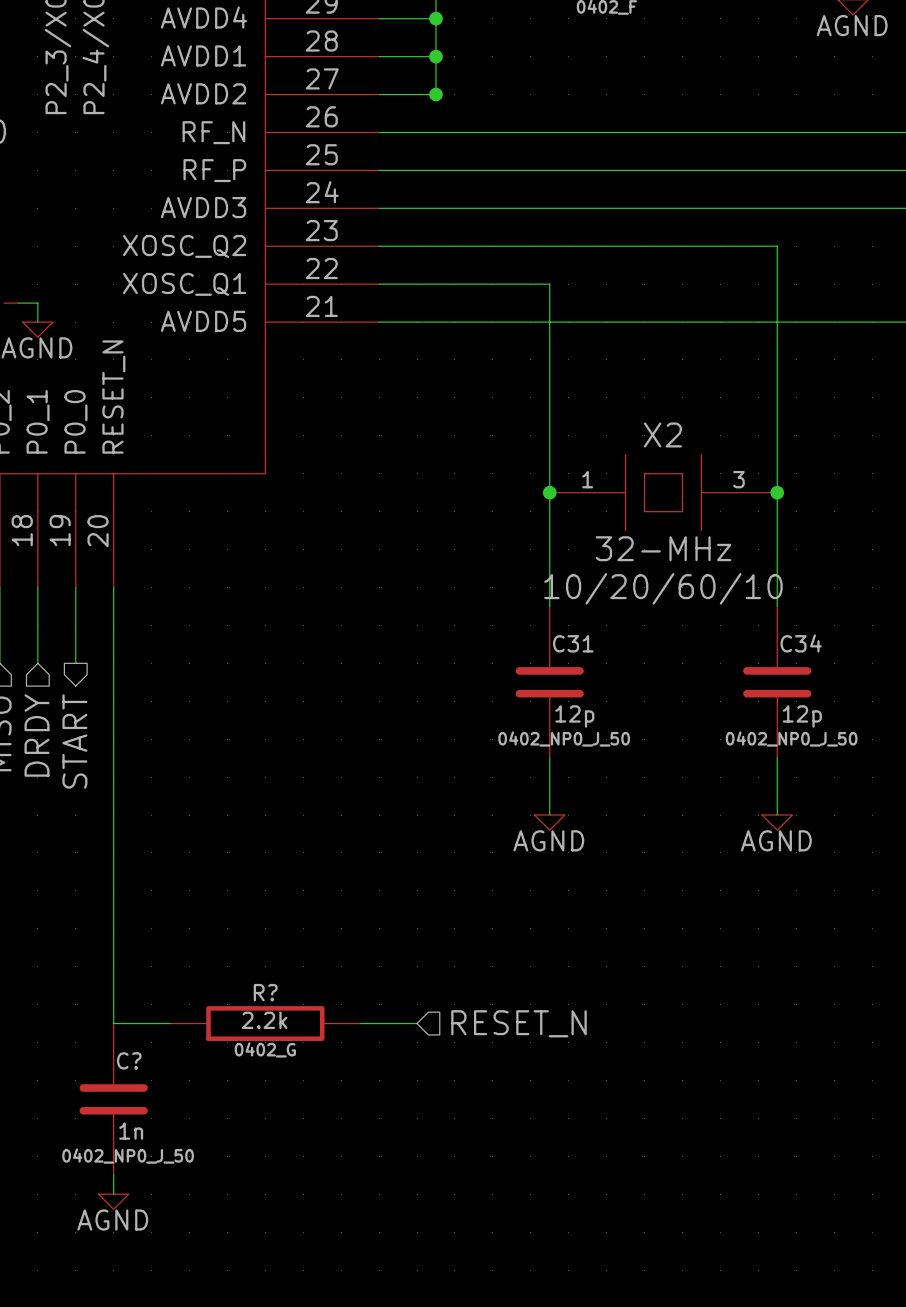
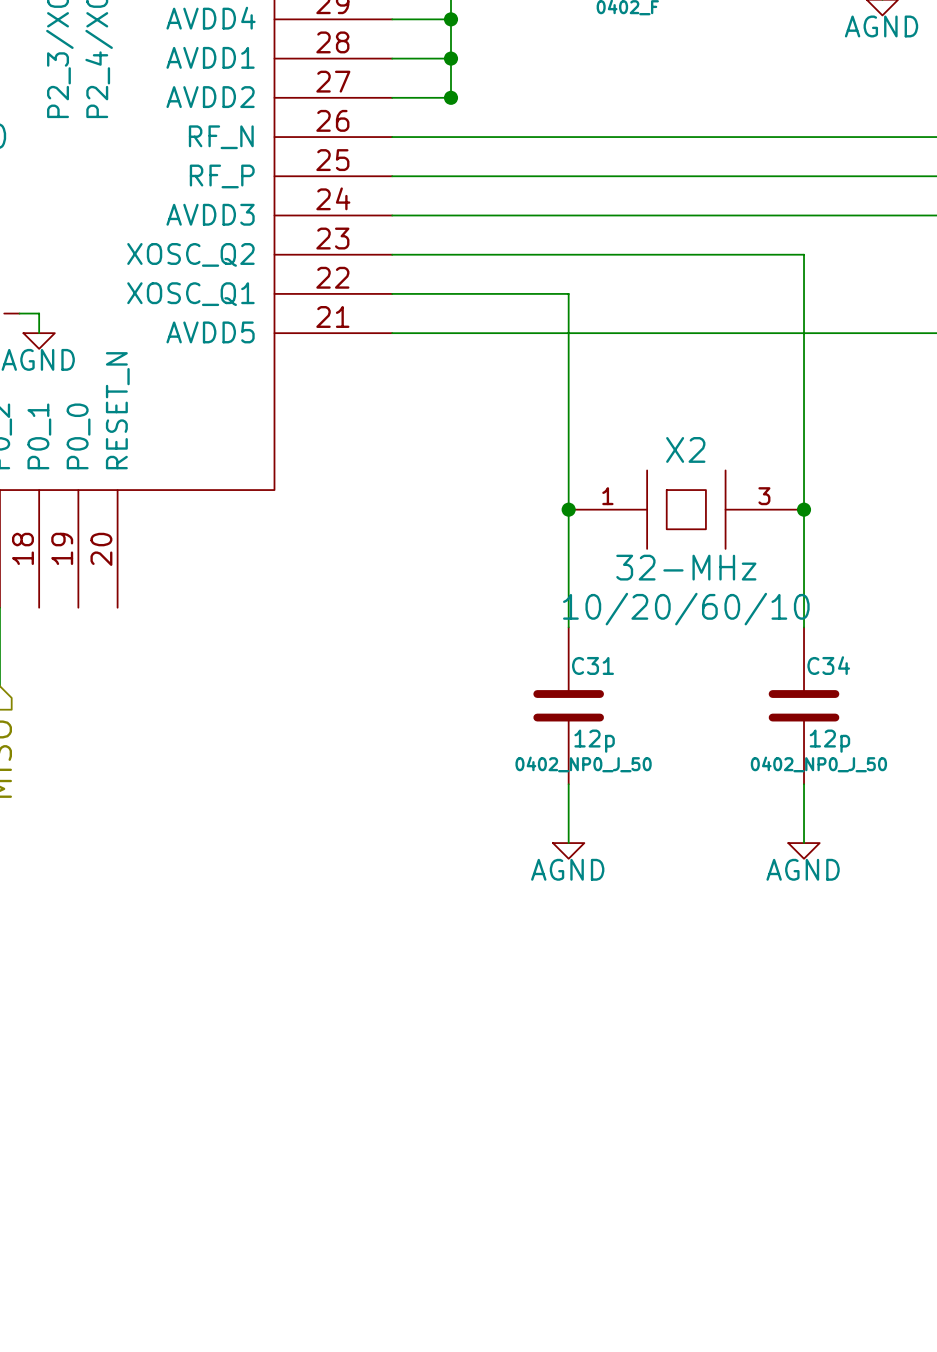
wire: (37, 587) (37, 663) -> none
wire: (75, 587) (75, 663) -> none
wire: (113, 587) (113, 1023) (170, 1023) -> none
hierarchical label: DRDY (36, 735) -> none
hierarchical label: START (74, 741) -> none
R?: 2.2k (265, 1023) -> none
wire: (360, 1023) (417, 1023) -> none
hierarchical label: RESET_N (519, 1023) -> none
C?: 1n (113, 1099) -> none
wire: (113, 1175) (113, 1194) -> none
power symbol: AGND (113, 1201) -> none

